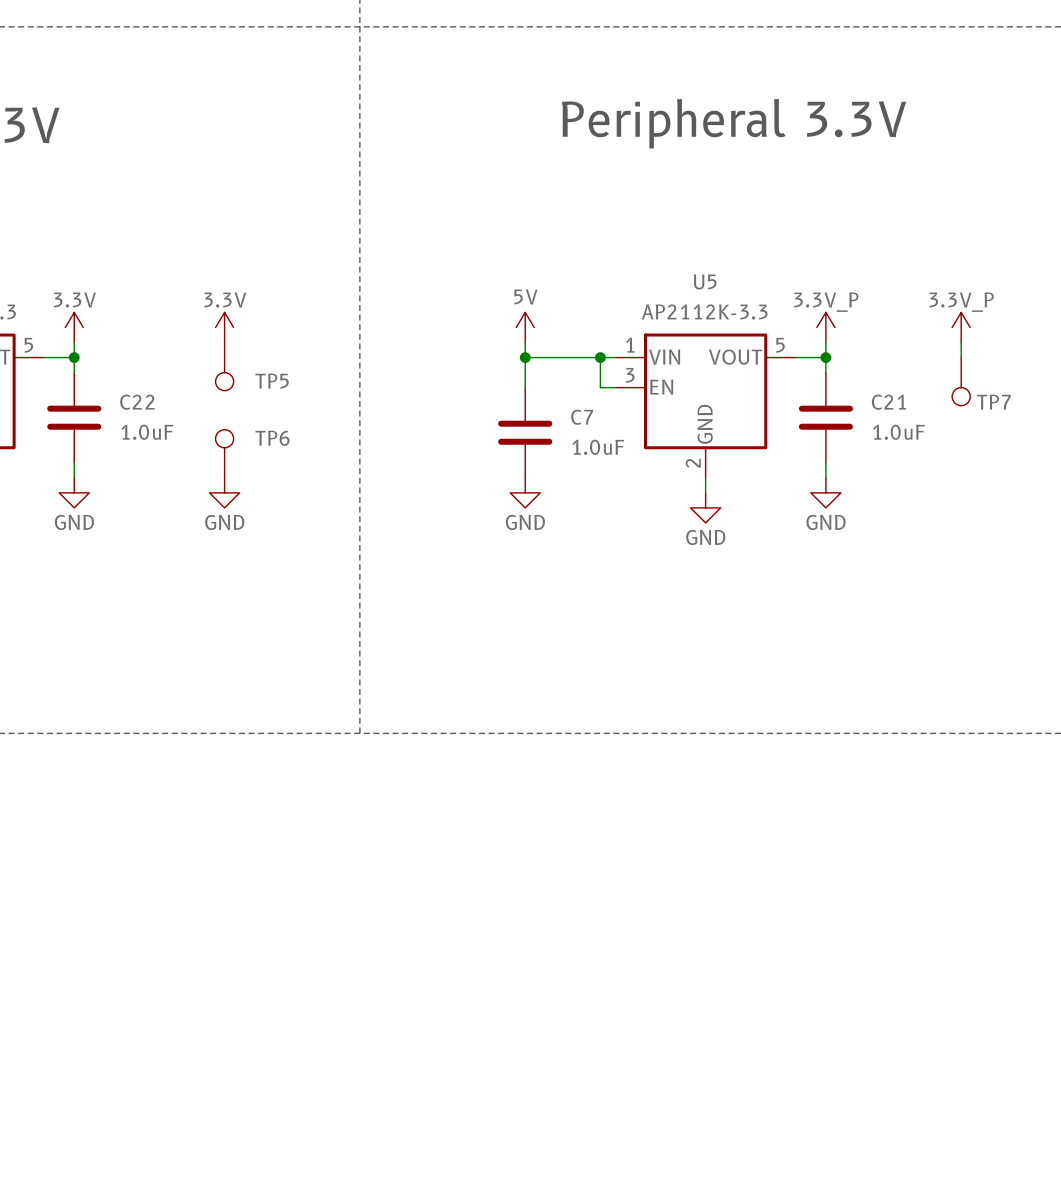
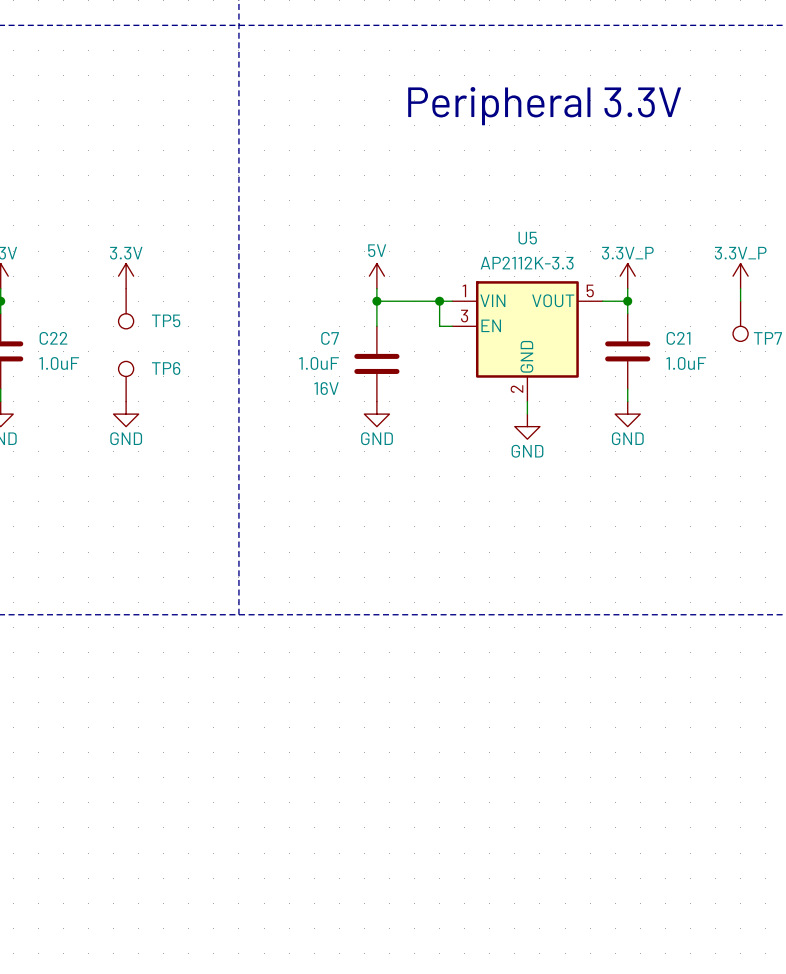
C7 name position: C7 (582, 417) -> C7 (330, 338)
C7 value position: 1.0uF (598, 447) -> 1.0uF (319, 363)
C7 text: none -> 16V (326, 388)

